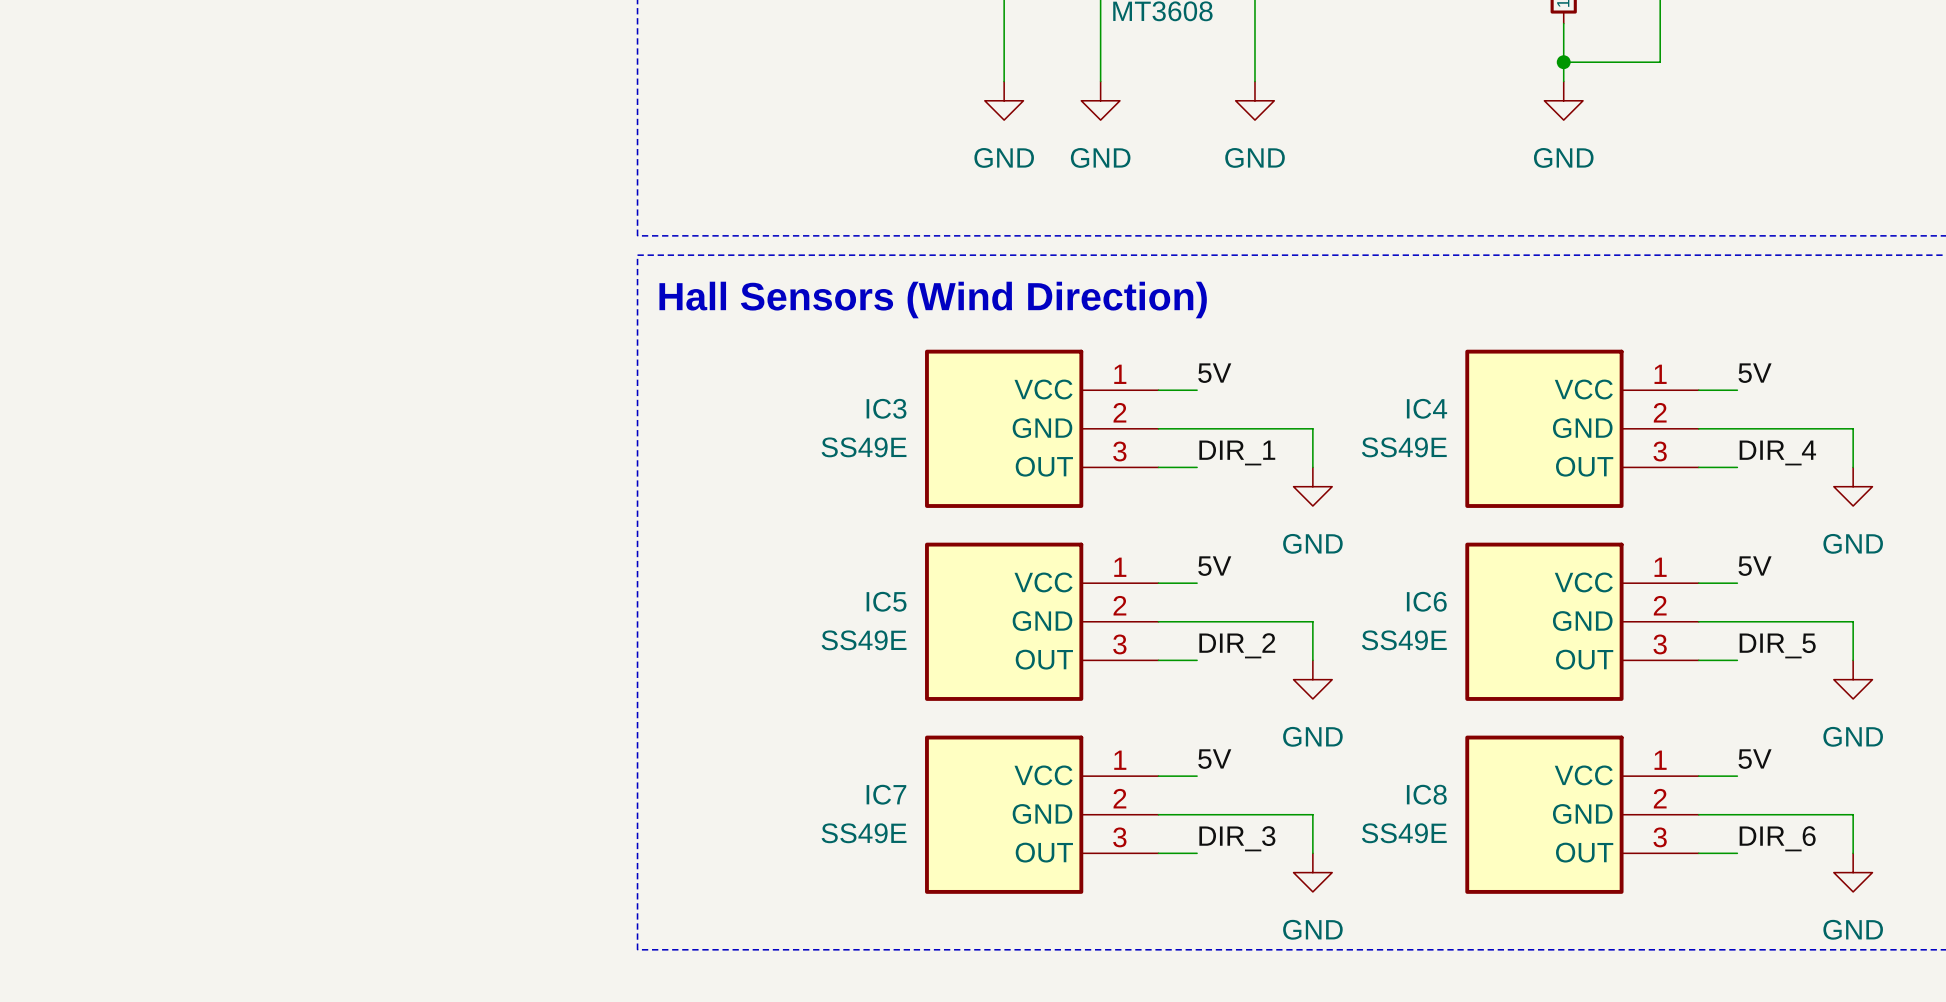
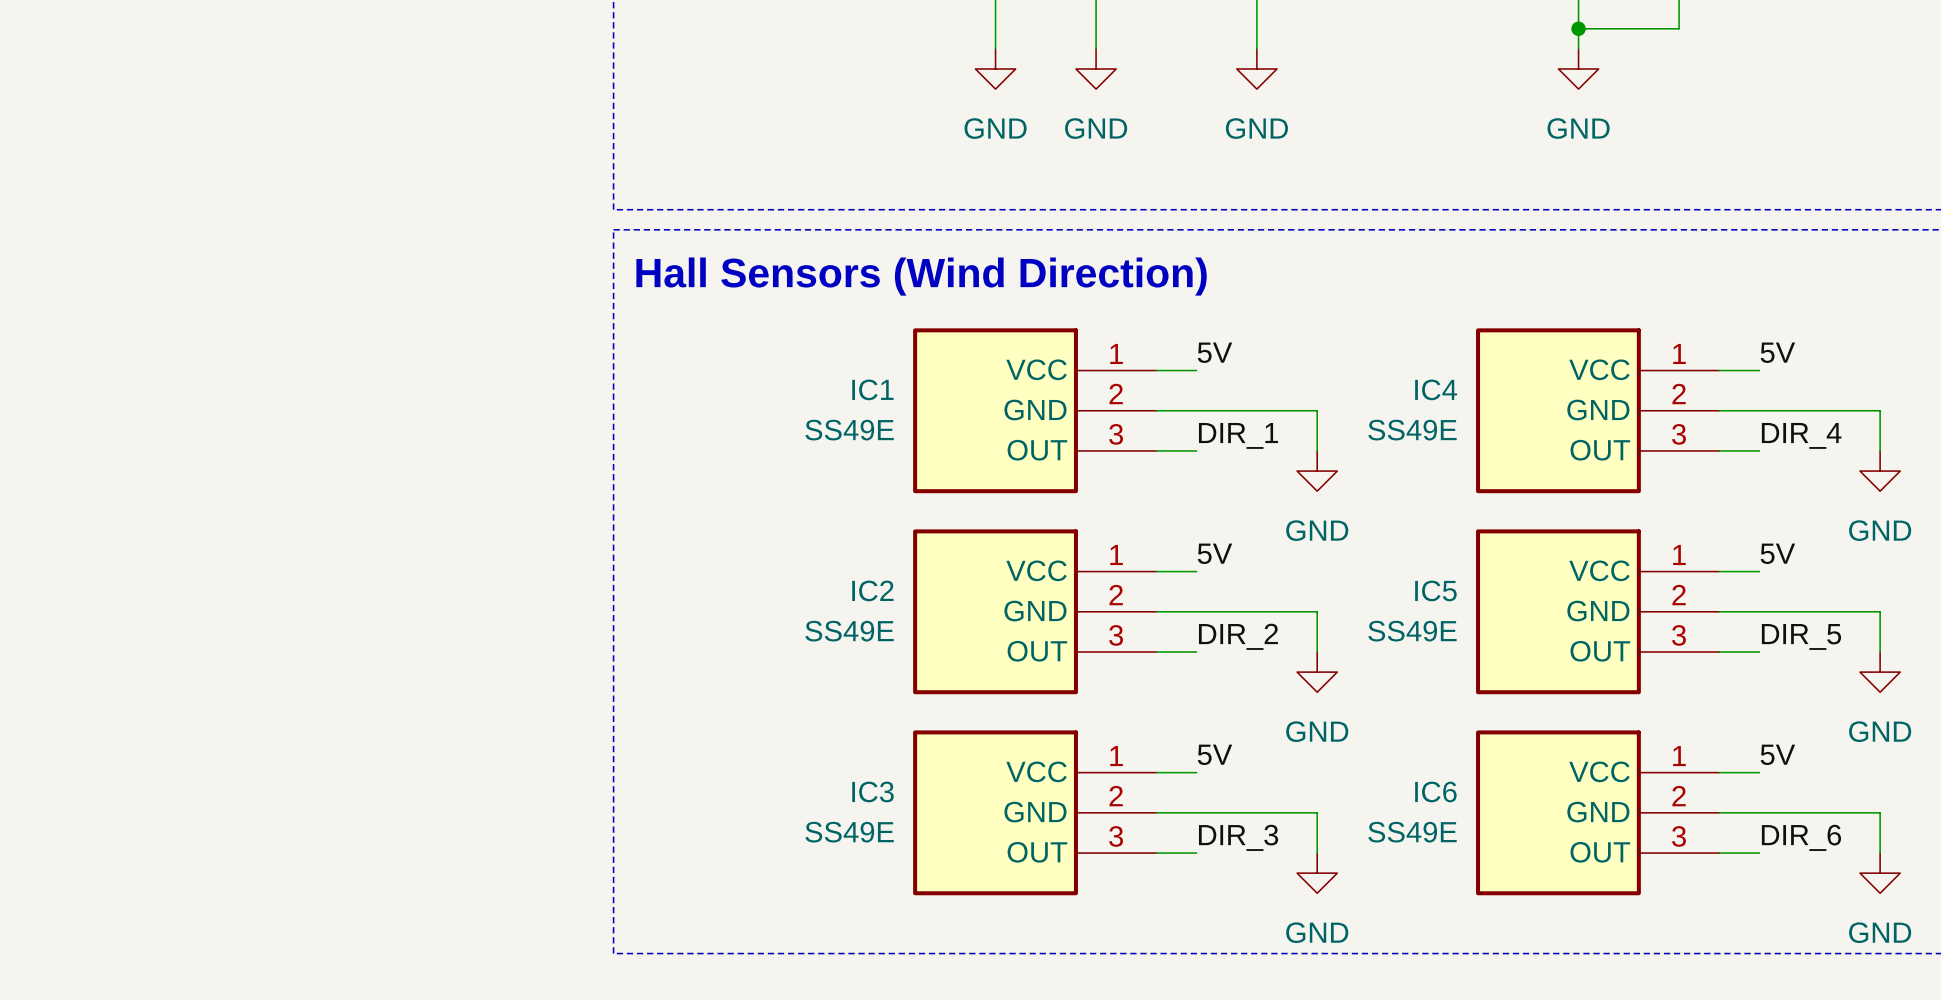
IC3 name: IC3 (886, 408) -> IC1 (872, 389)
IC5 name: IC5 (886, 601) -> IC2 (872, 590)
IC6 name: IC6 (1426, 601) -> IC5 (1435, 590)
IC7 name: IC7 (886, 794) -> IC3 (872, 791)
IC8 name: IC8 (1426, 794) -> IC6 (1435, 791)

